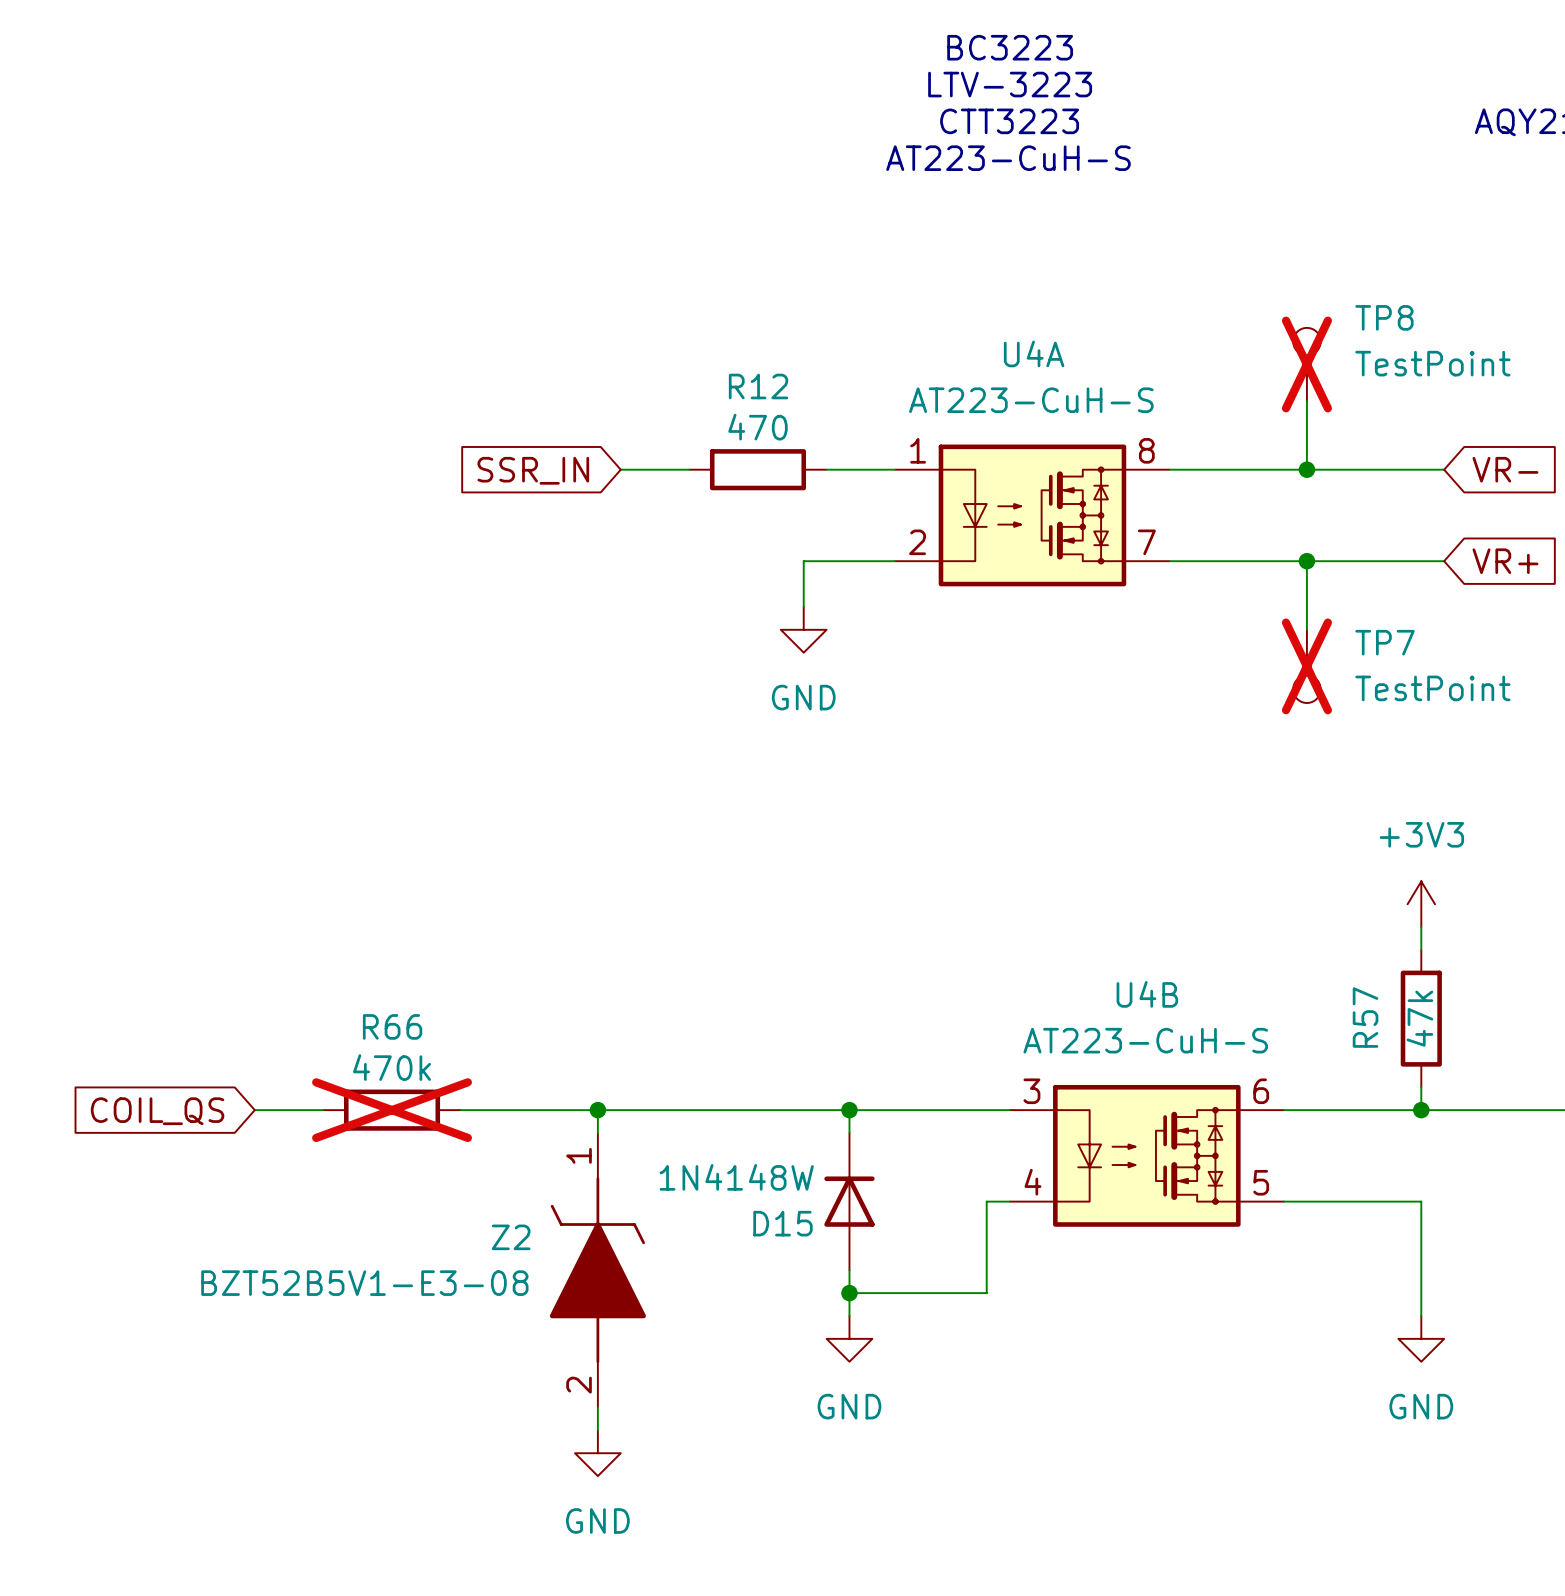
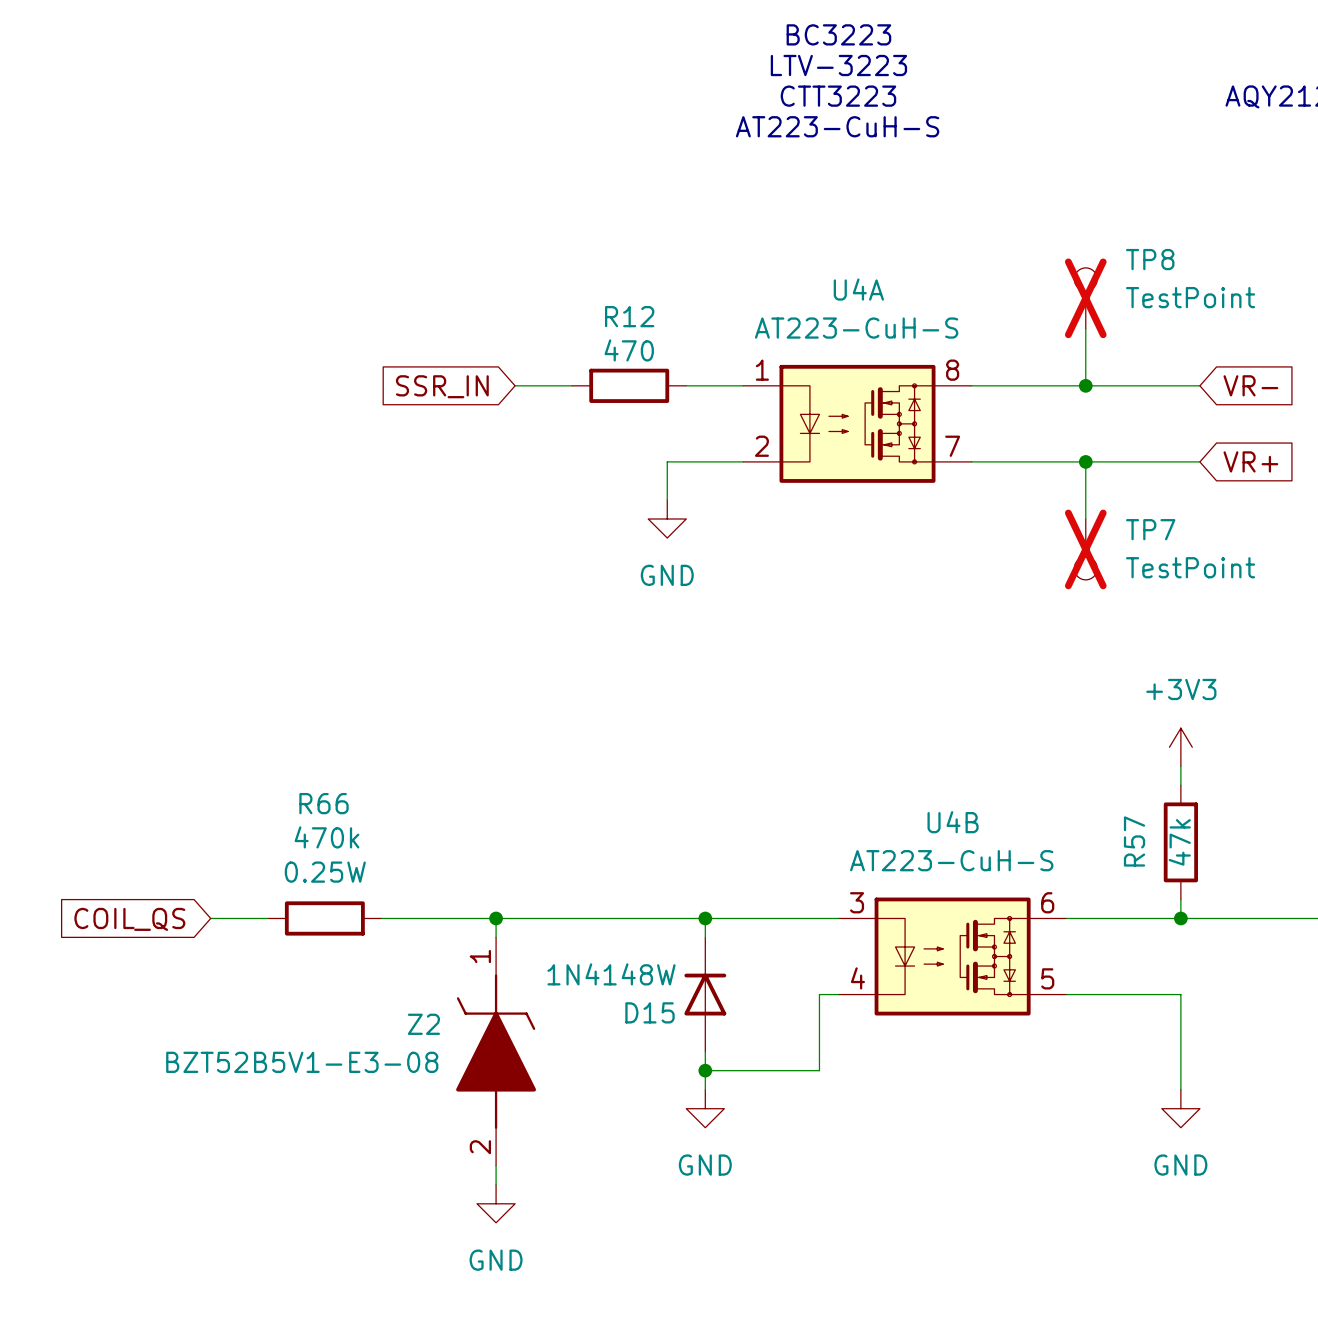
R66 name position: R66 (392, 1026) -> R66 (324, 803)
R66 text: none -> 0.25W (325, 872)
R66 value position: 470k (392, 1067) -> 470k (327, 837)
R66 do-not-place cross: (392, 1110) -> none

